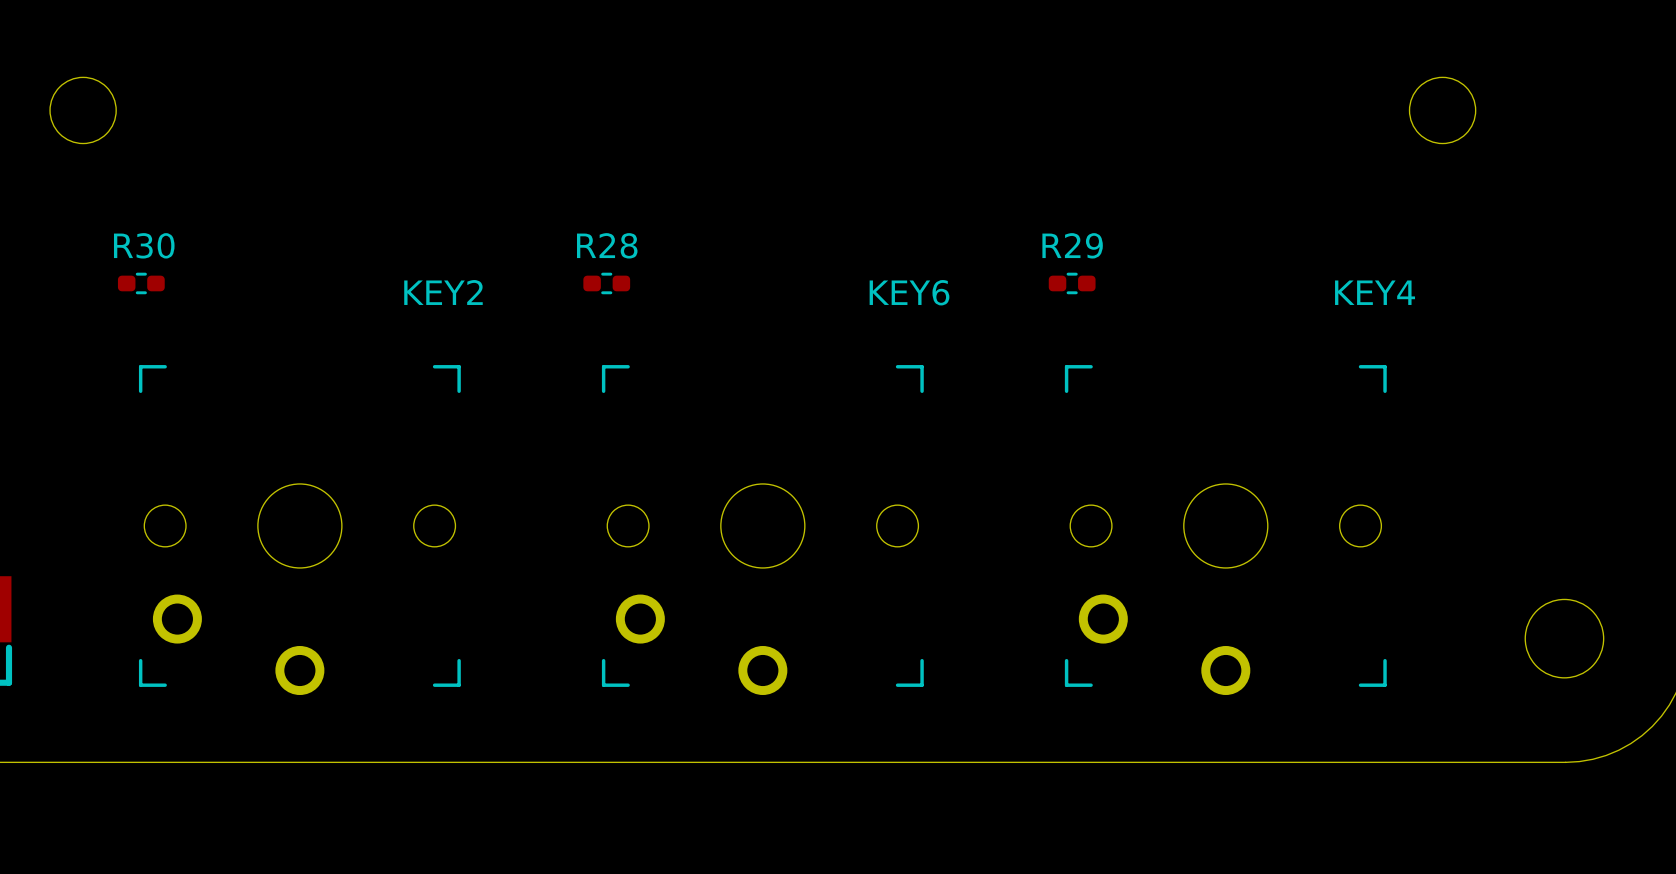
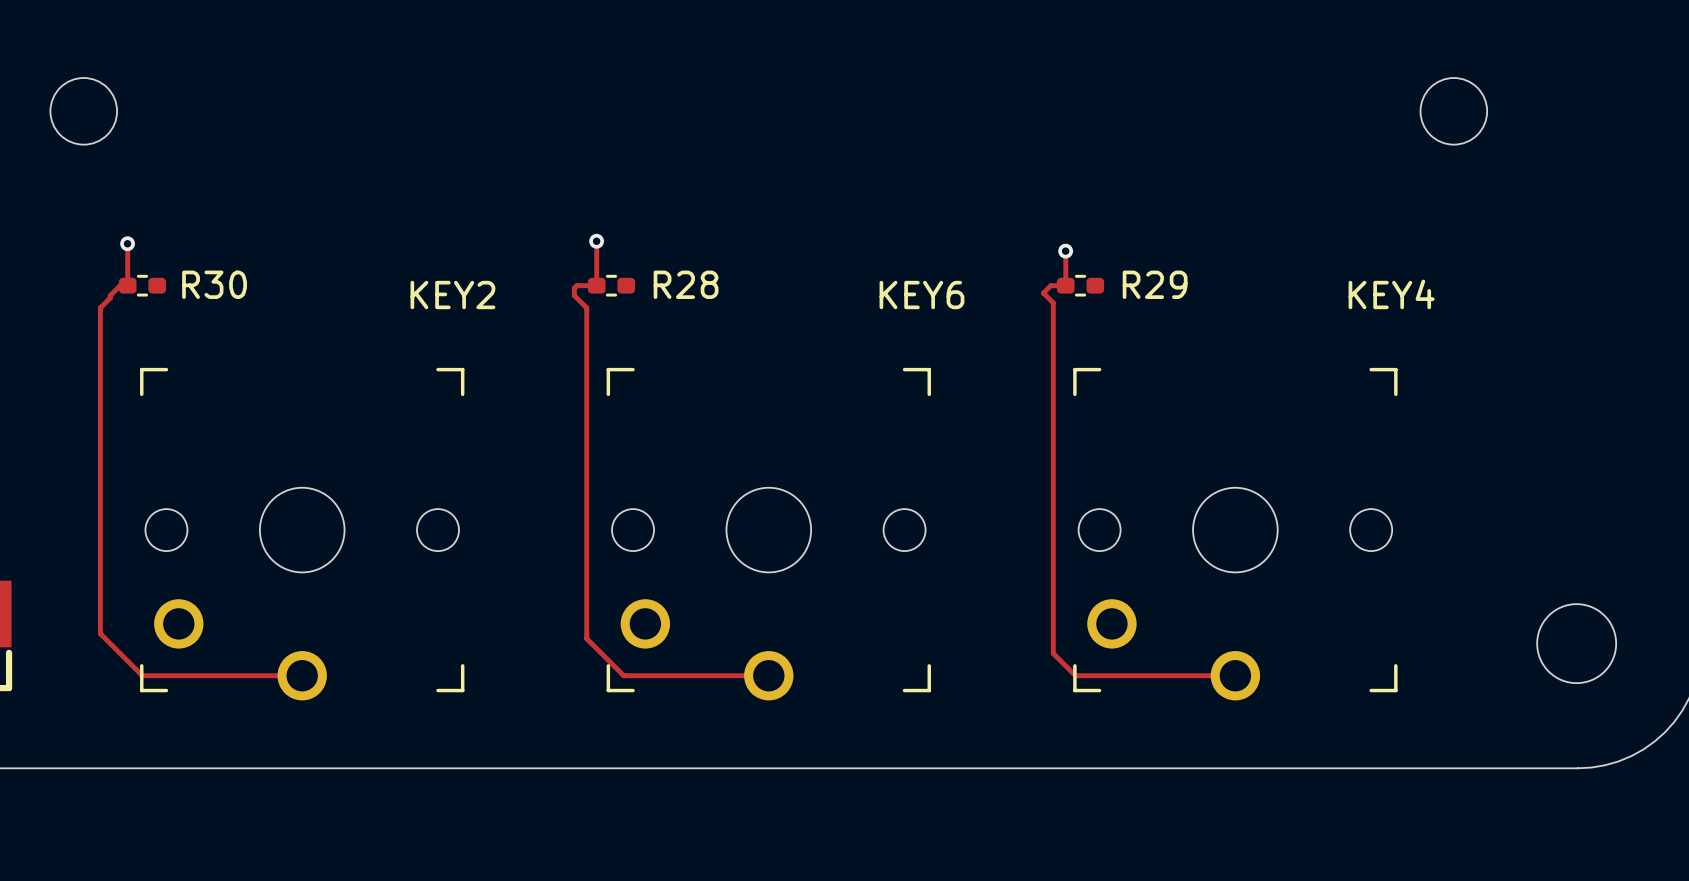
via: none -> (596, 241)
track: none -> (596, 241) (596, 285) (576, 285) (574, 288) (574, 295) (586, 307) (586, 638) (623, 675) (768, 675)
track: none -> (127, 243) (127, 285) (120, 285) (100, 307) (100, 633) (142, 675) (302, 675)
via: none -> (127, 243)
R30 name position: R30 (144, 245) -> R30 (214, 284)
R28 name position: R28 (607, 245) -> R28 (686, 284)
R29 name position: R29 (1072, 245) -> R29 (1155, 284)
track: none -> (1065, 251) (1065, 285) (1050, 285) (1043, 293) (1053, 302) (1053, 653) (1075, 675) (1235, 675)
via: none -> (1065, 251)

